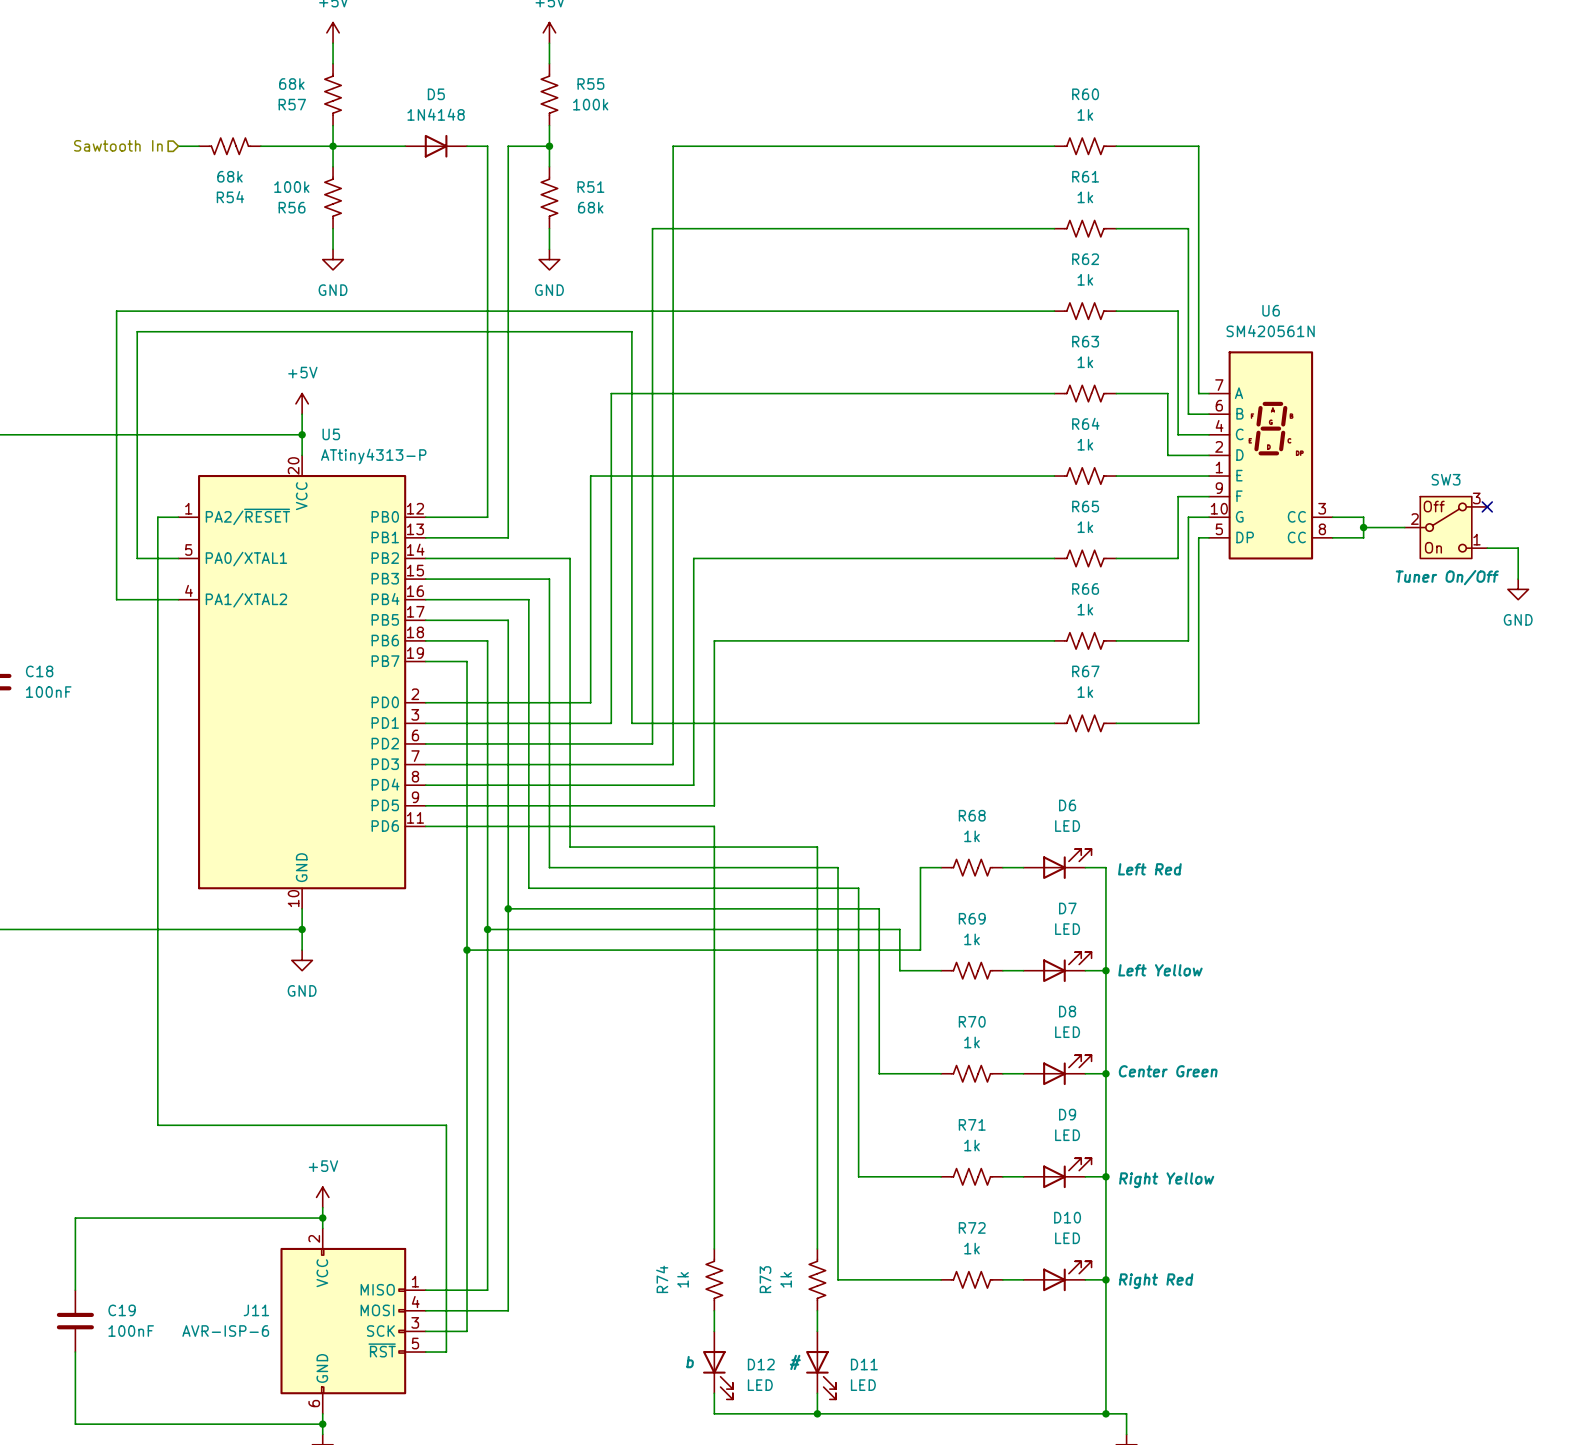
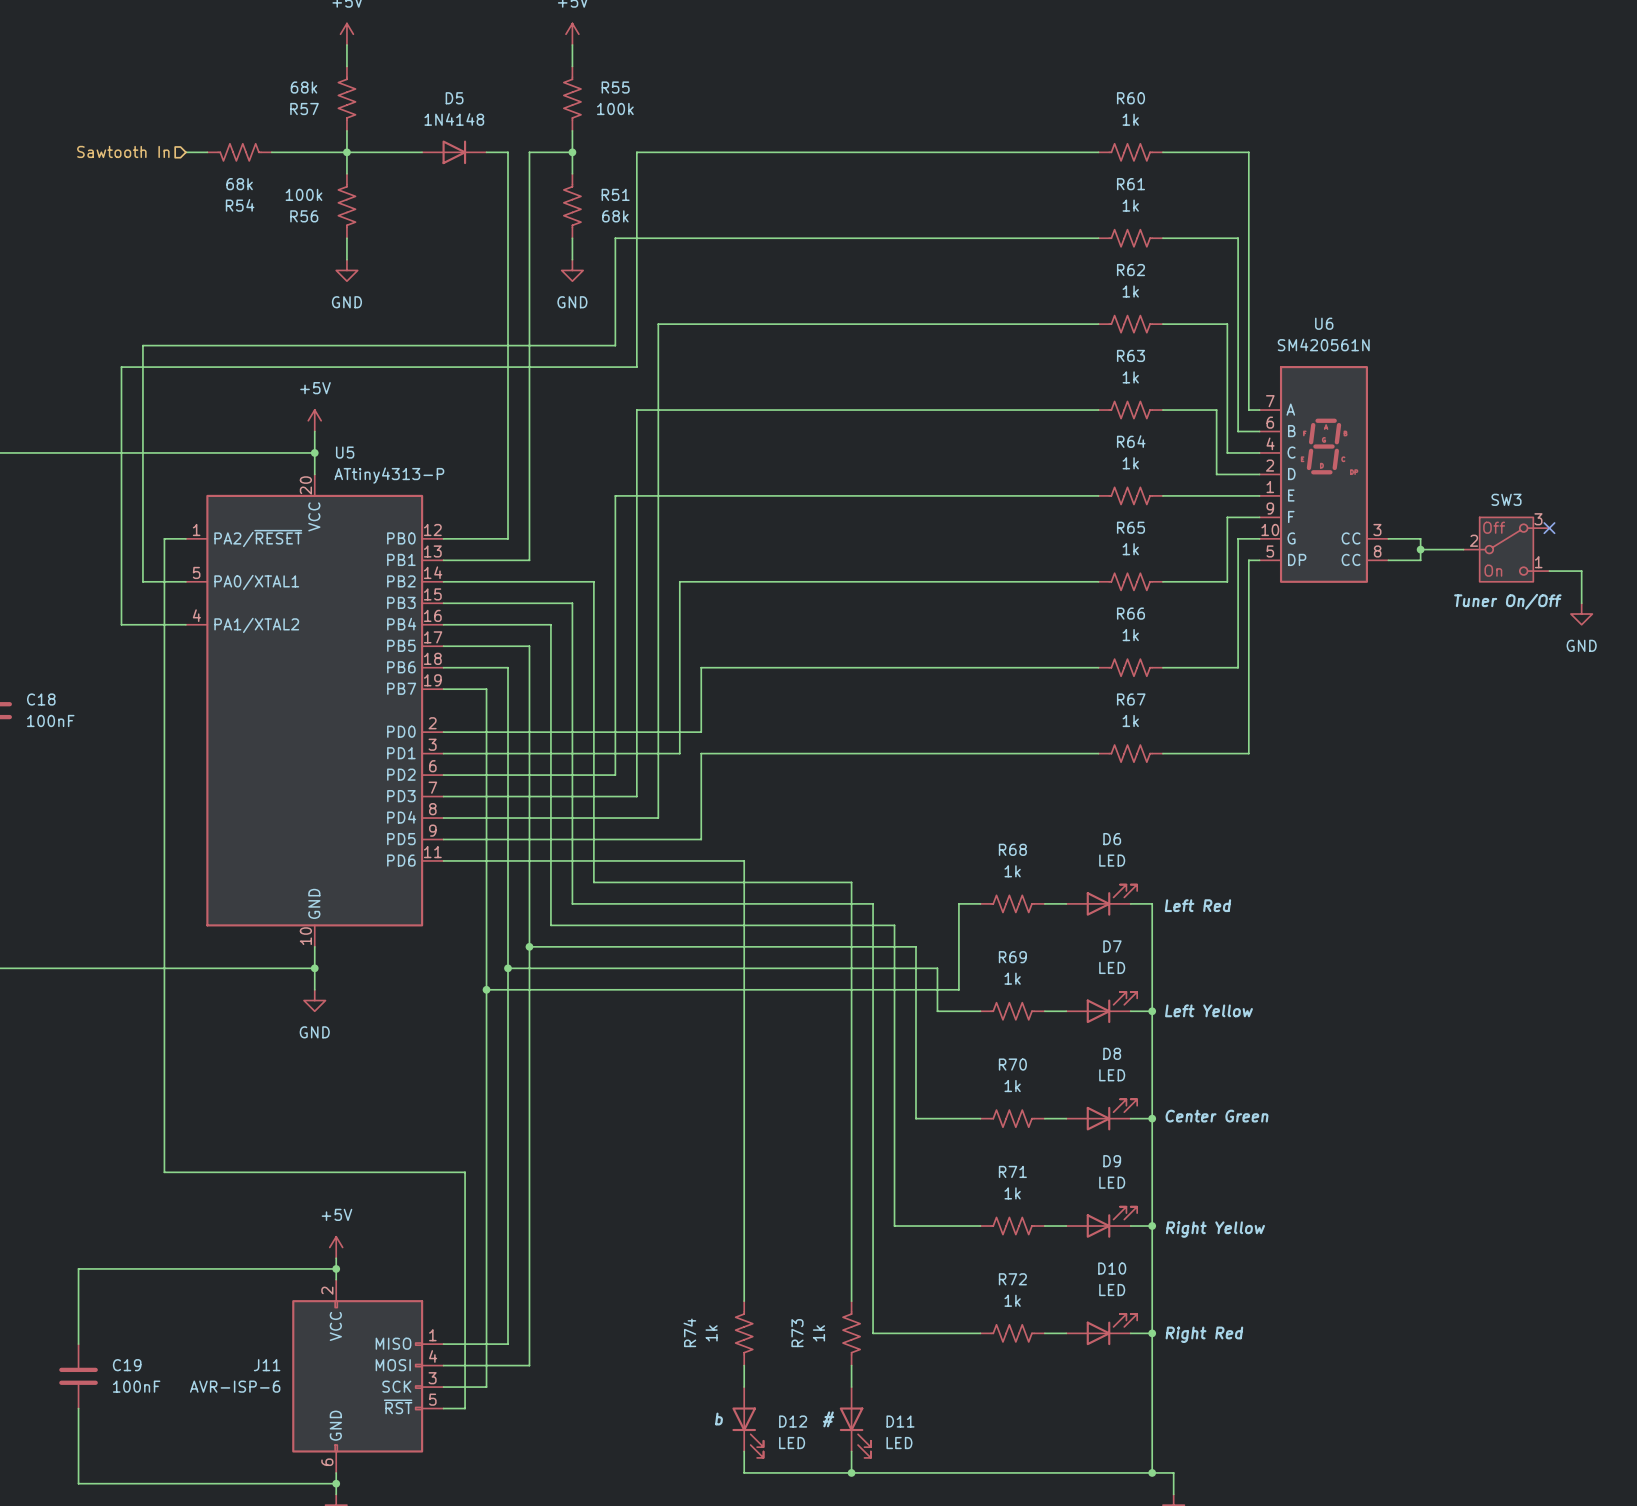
wire: (673, 146) (673, 640) -> (744, 667) (701, 667)
wire: (652, 228) (652, 558) -> (679, 238) (615, 238) (615, 345)
wire: (631, 311) (116, 311) (116, 352) -> (701, 152) (636, 152) (636, 367) (121, 367)
wire: (590, 331) (631, 331) -> (658, 324) (658, 345)
wire: (693, 558) (693, 785) (631, 785) -> (722, 581) (679, 581)
wire: (714, 640) (714, 805) (673, 805) -> (701, 796) (701, 839)
wire: (673, 702) (673, 723) (652, 723) (652, 743) (590, 743) -> (701, 732) (615, 732) (615, 775)
wire: (611, 764) (673, 764) -> (636, 796) (636, 753) (658, 753) (658, 818)

